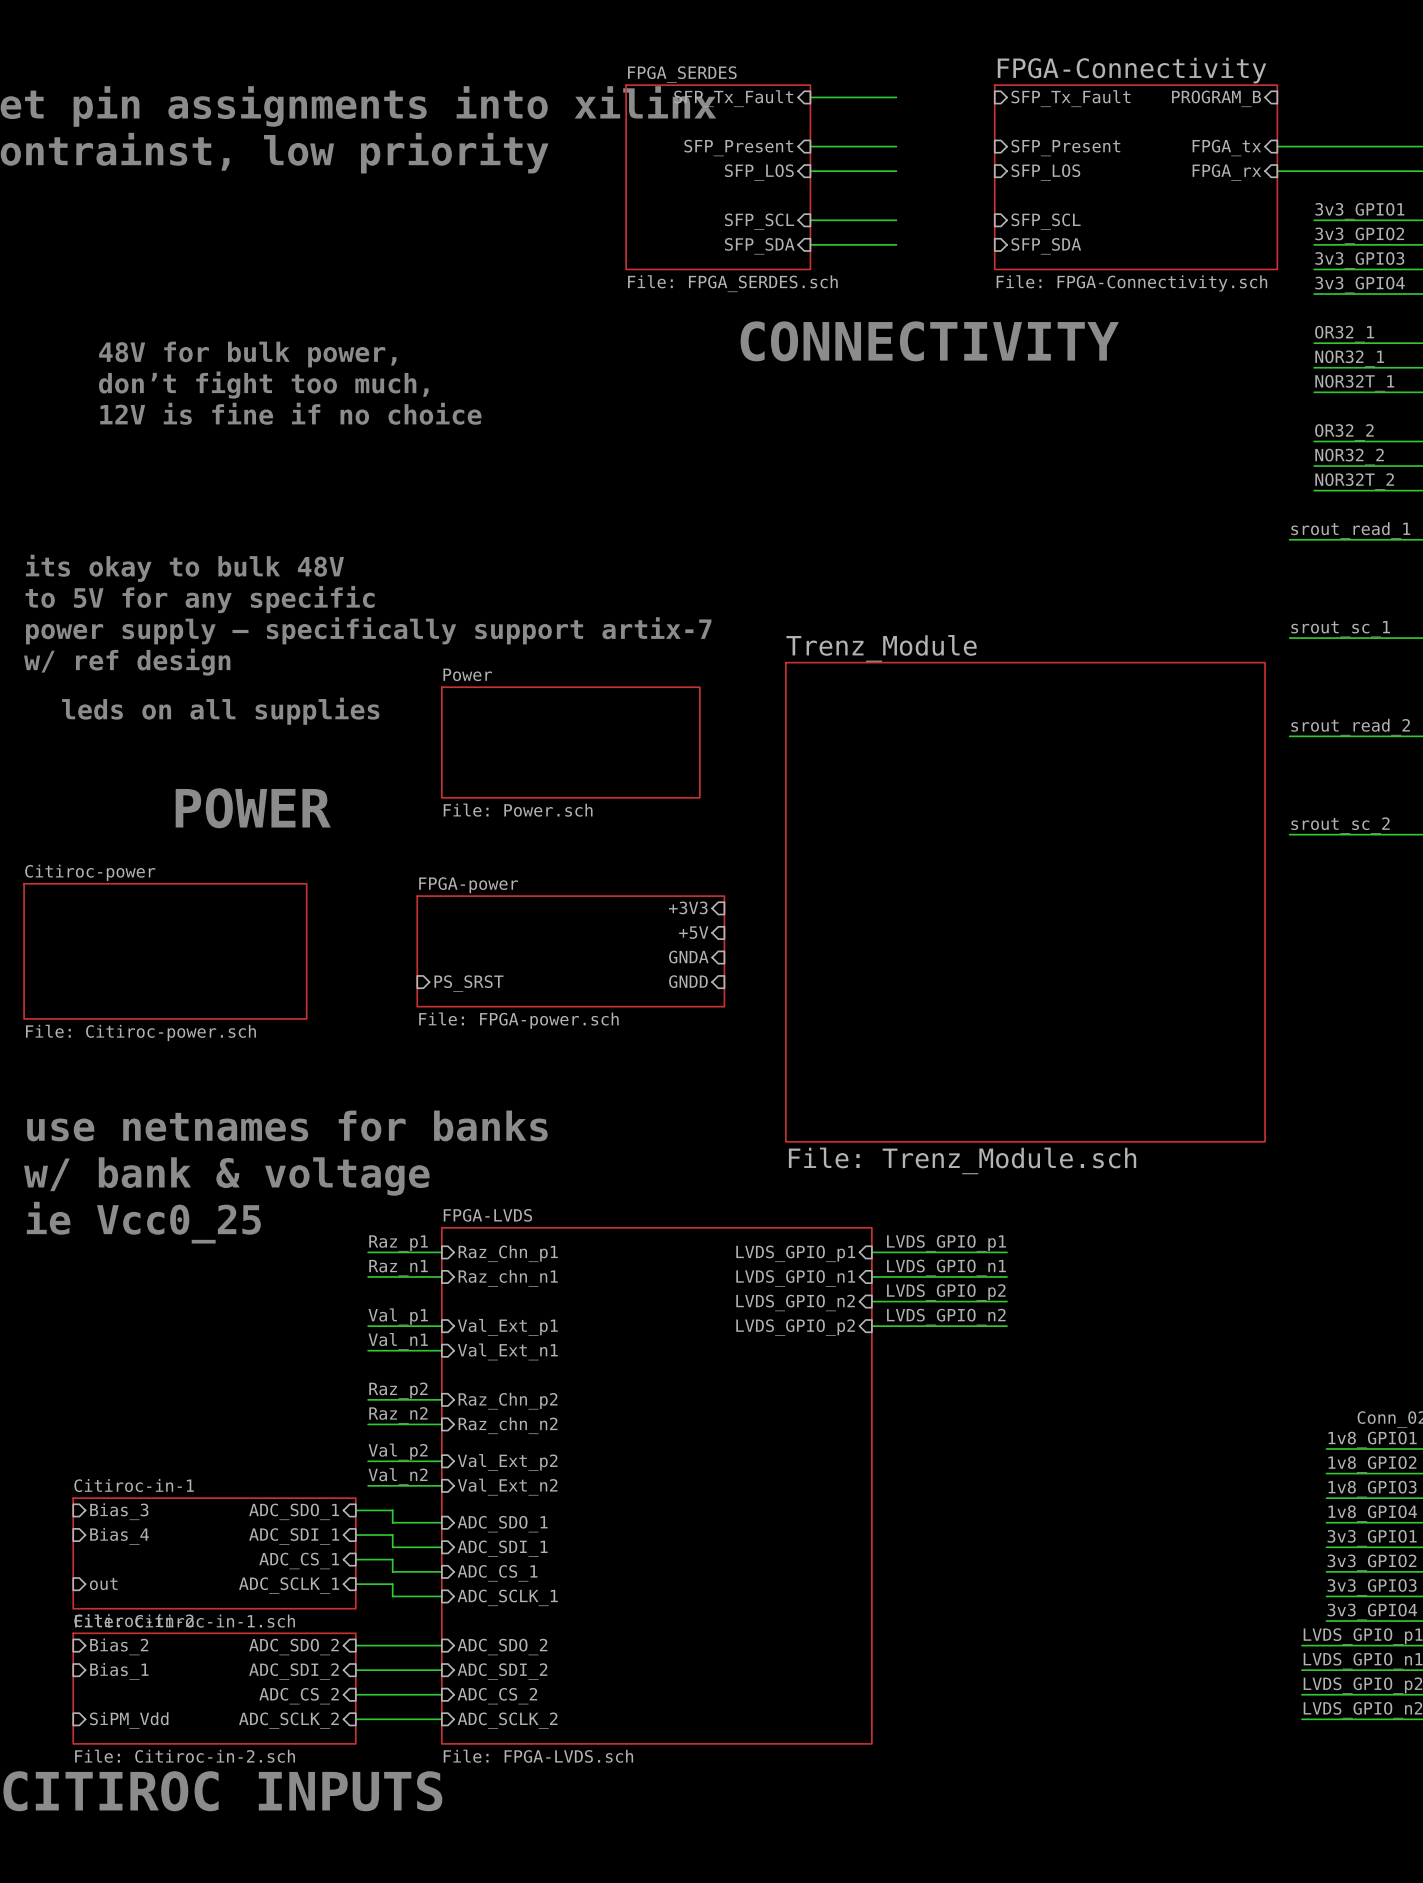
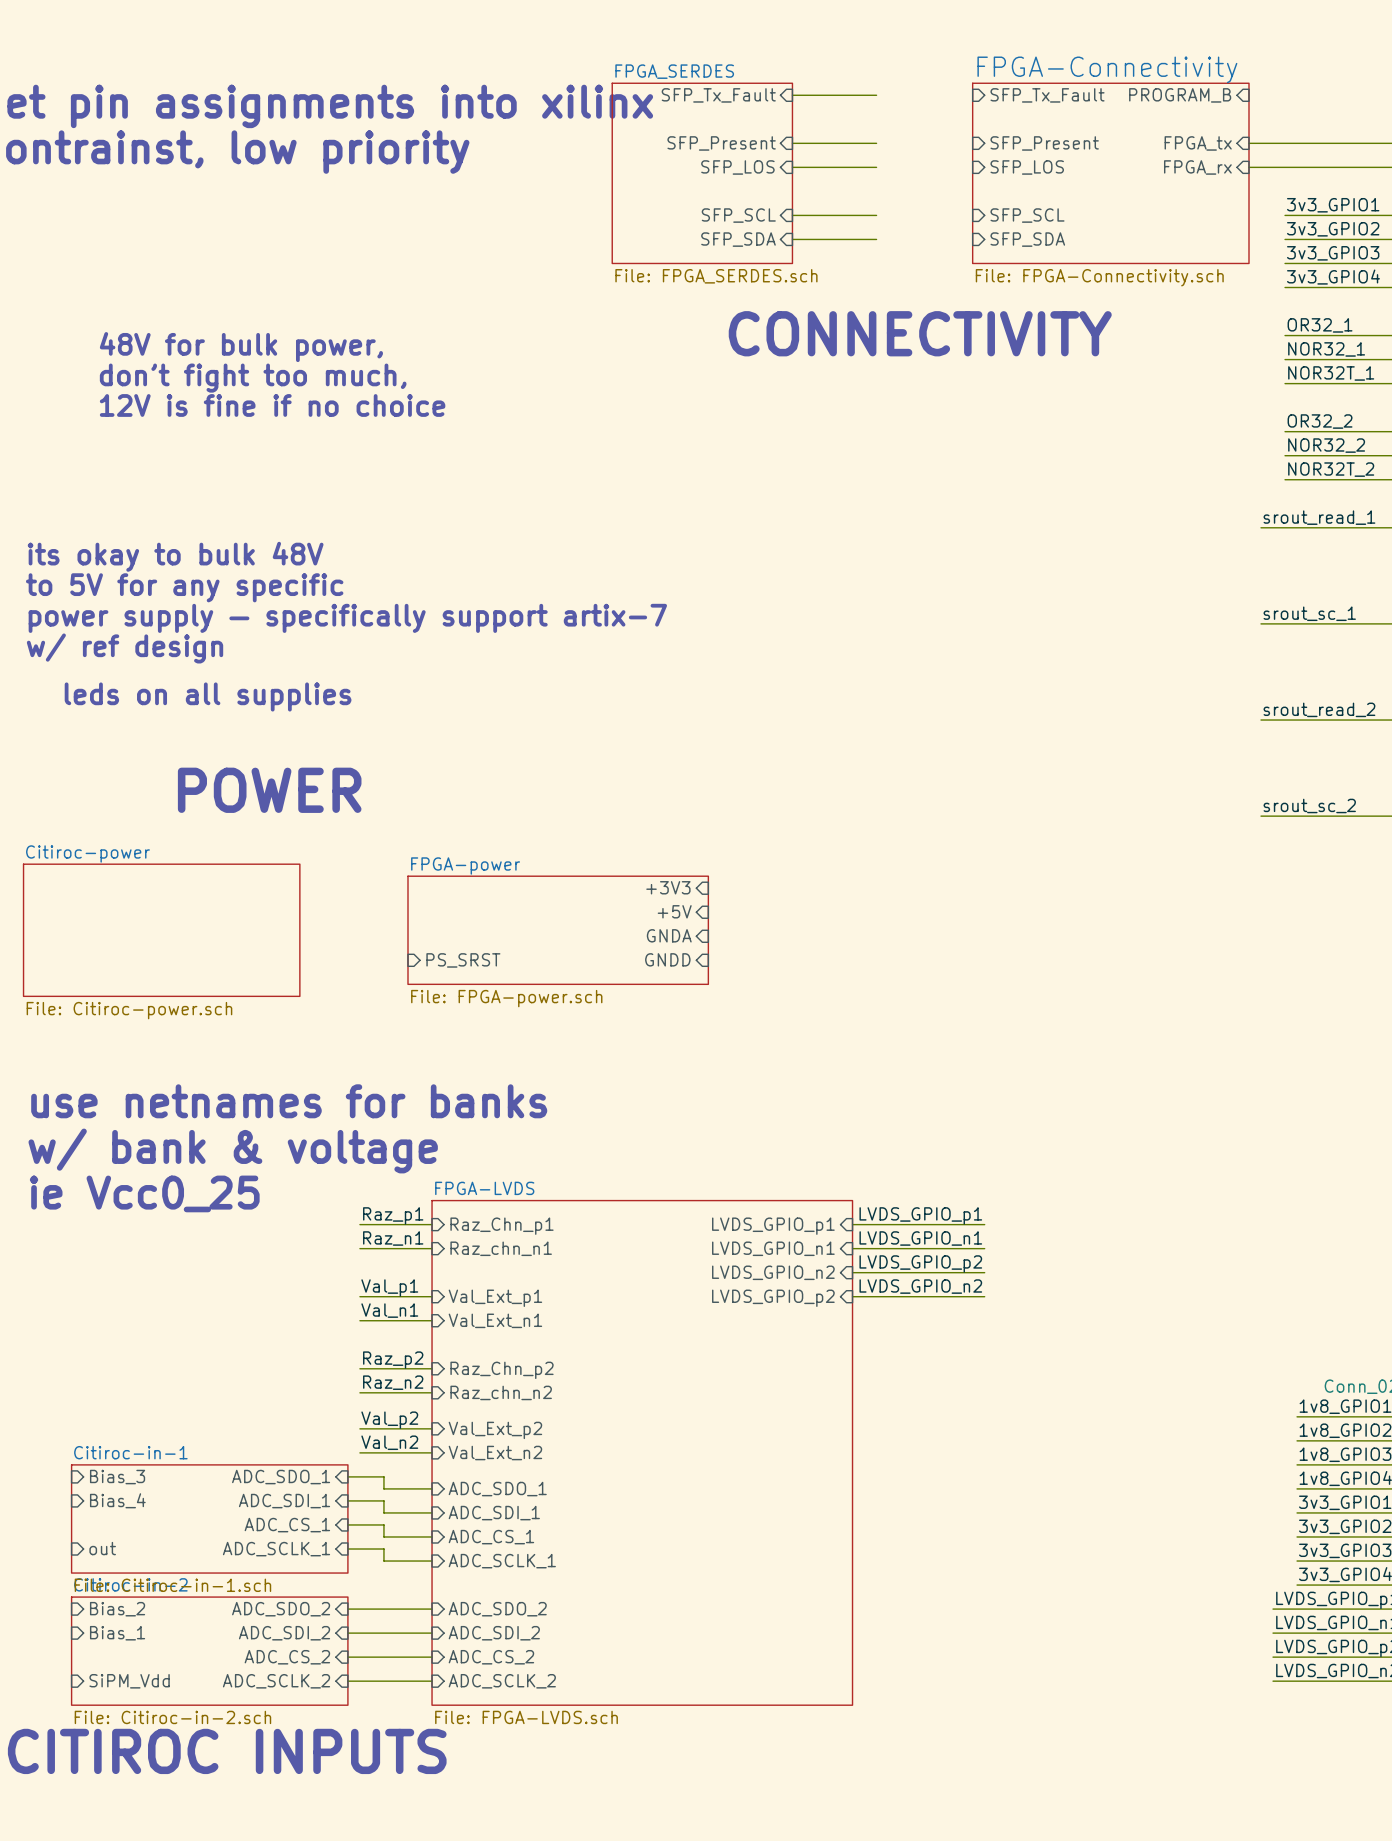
sheet Power: File: Power.sch (570, 742) -> none
sheet Trenz_Module: File: Trenz_Module.sch (1025, 902) -> none

